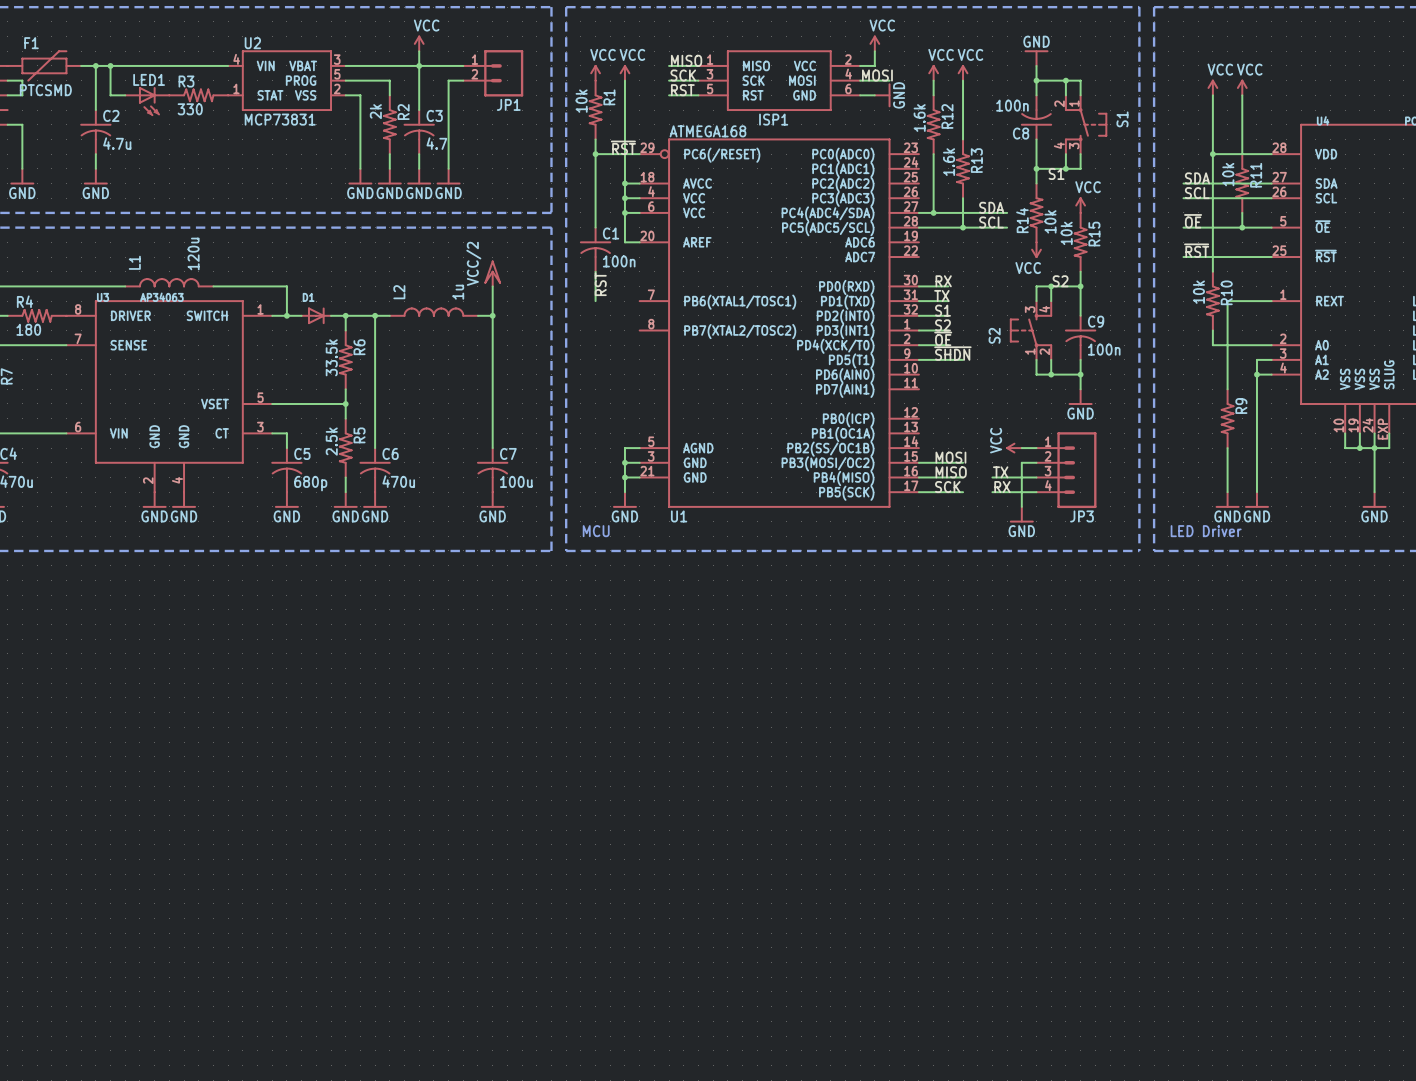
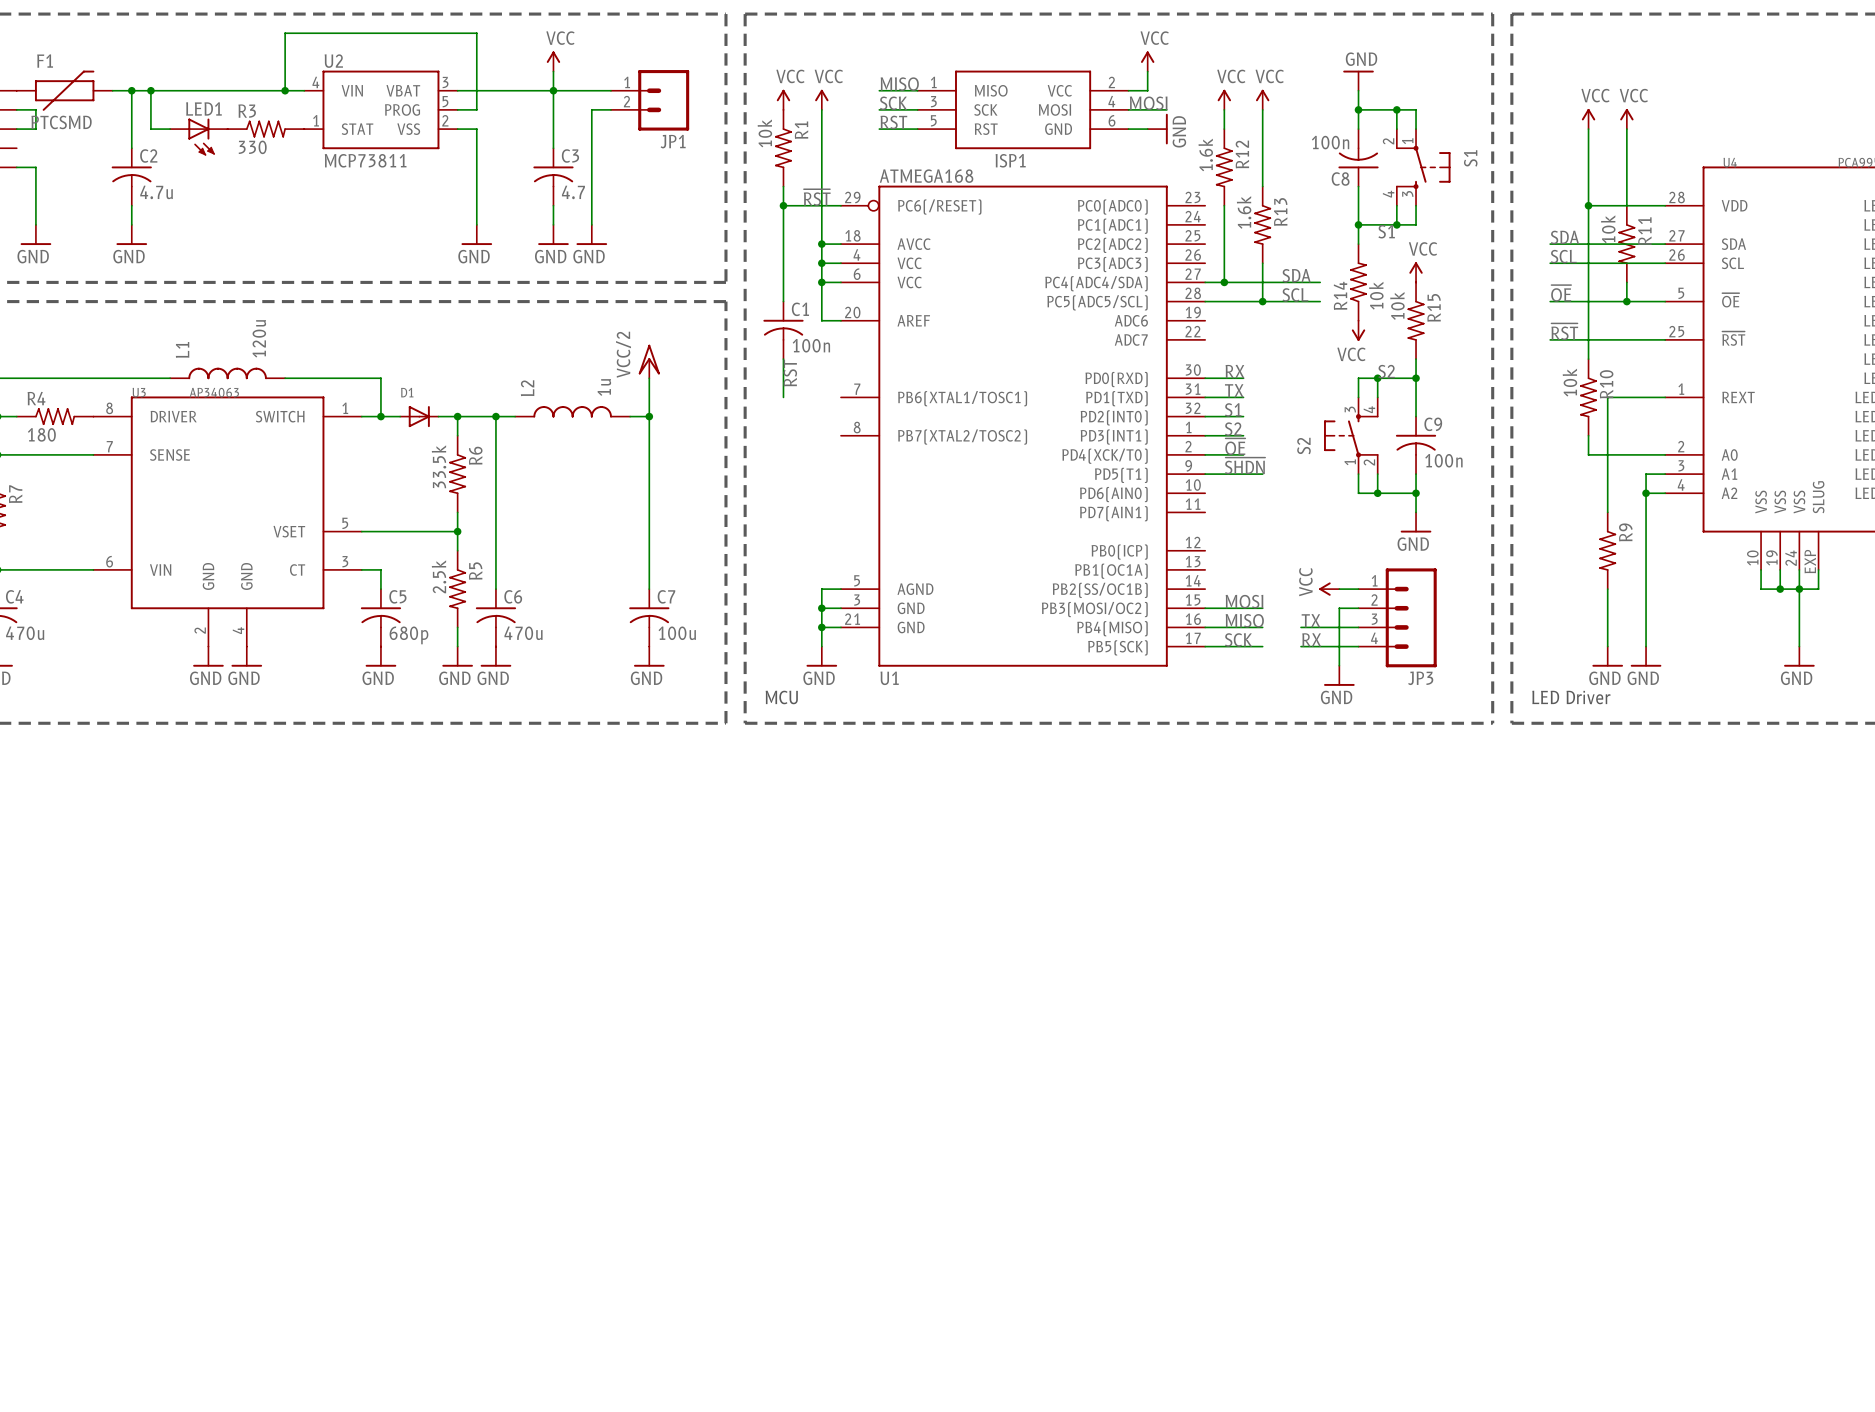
junction: none -> (285, 90)
wire: (360, 80) (389, 80) (389, 95) -> (476, 109) (476, 33) (285, 33) (285, 90)
U2 value: MCP73831 (280, 119) -> MCP73811 (365, 160)
R2: 2k (389, 124) -> none
wire: (389, 154) (389, 168) -> none
power symbol: GND (389, 176) -> none

